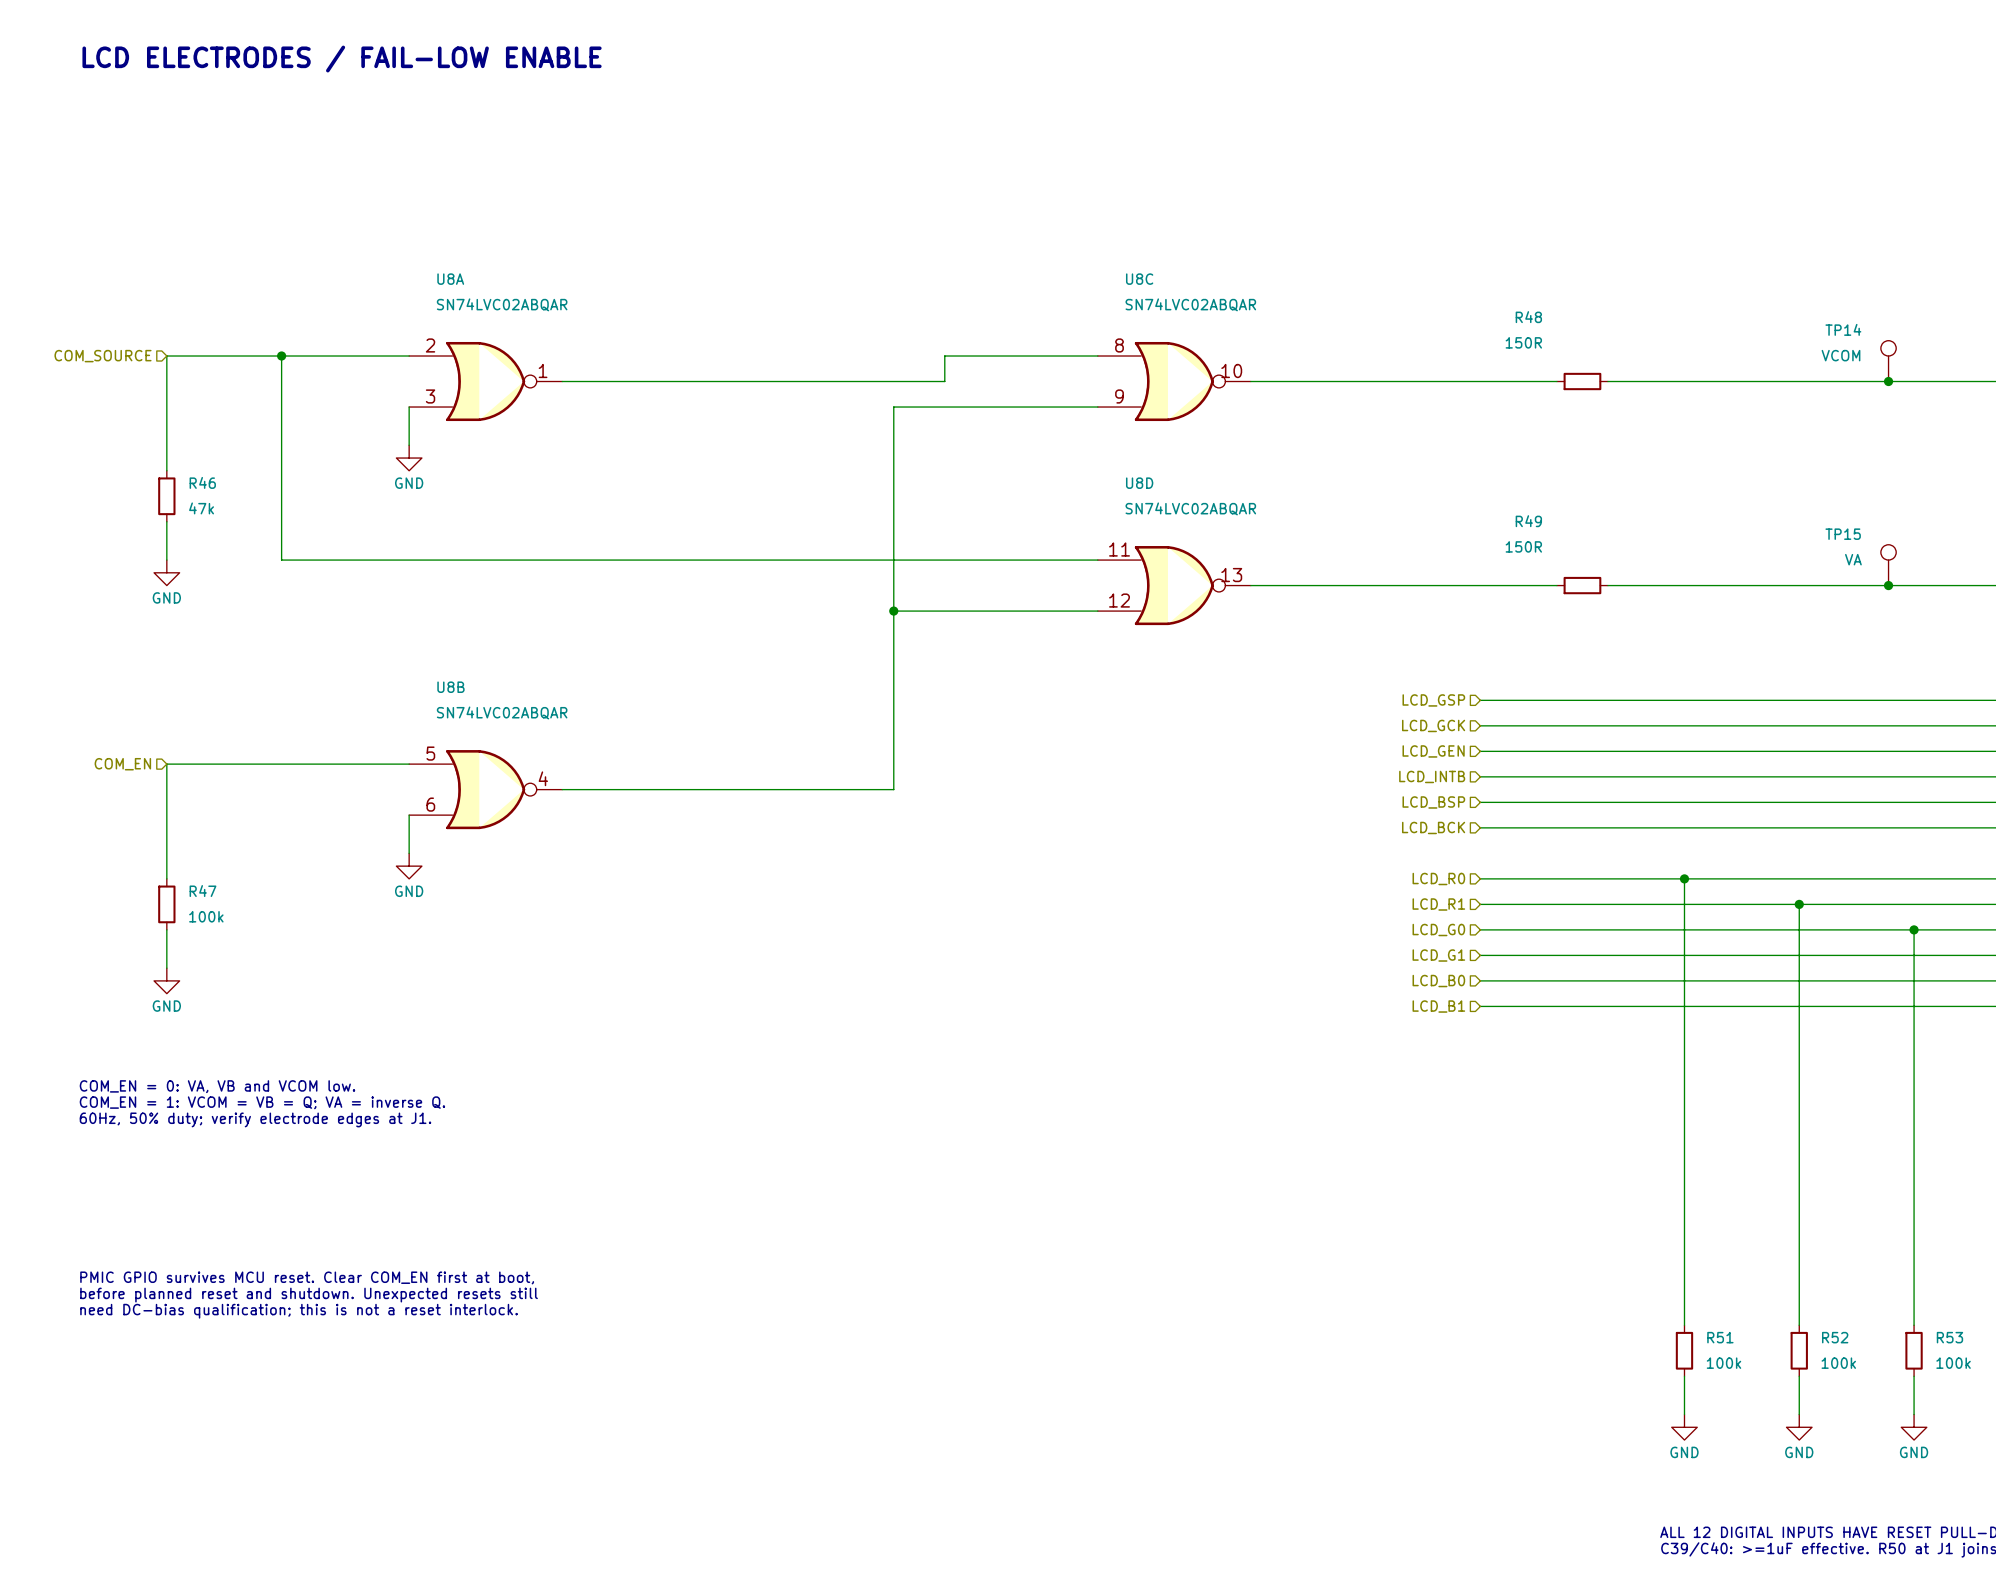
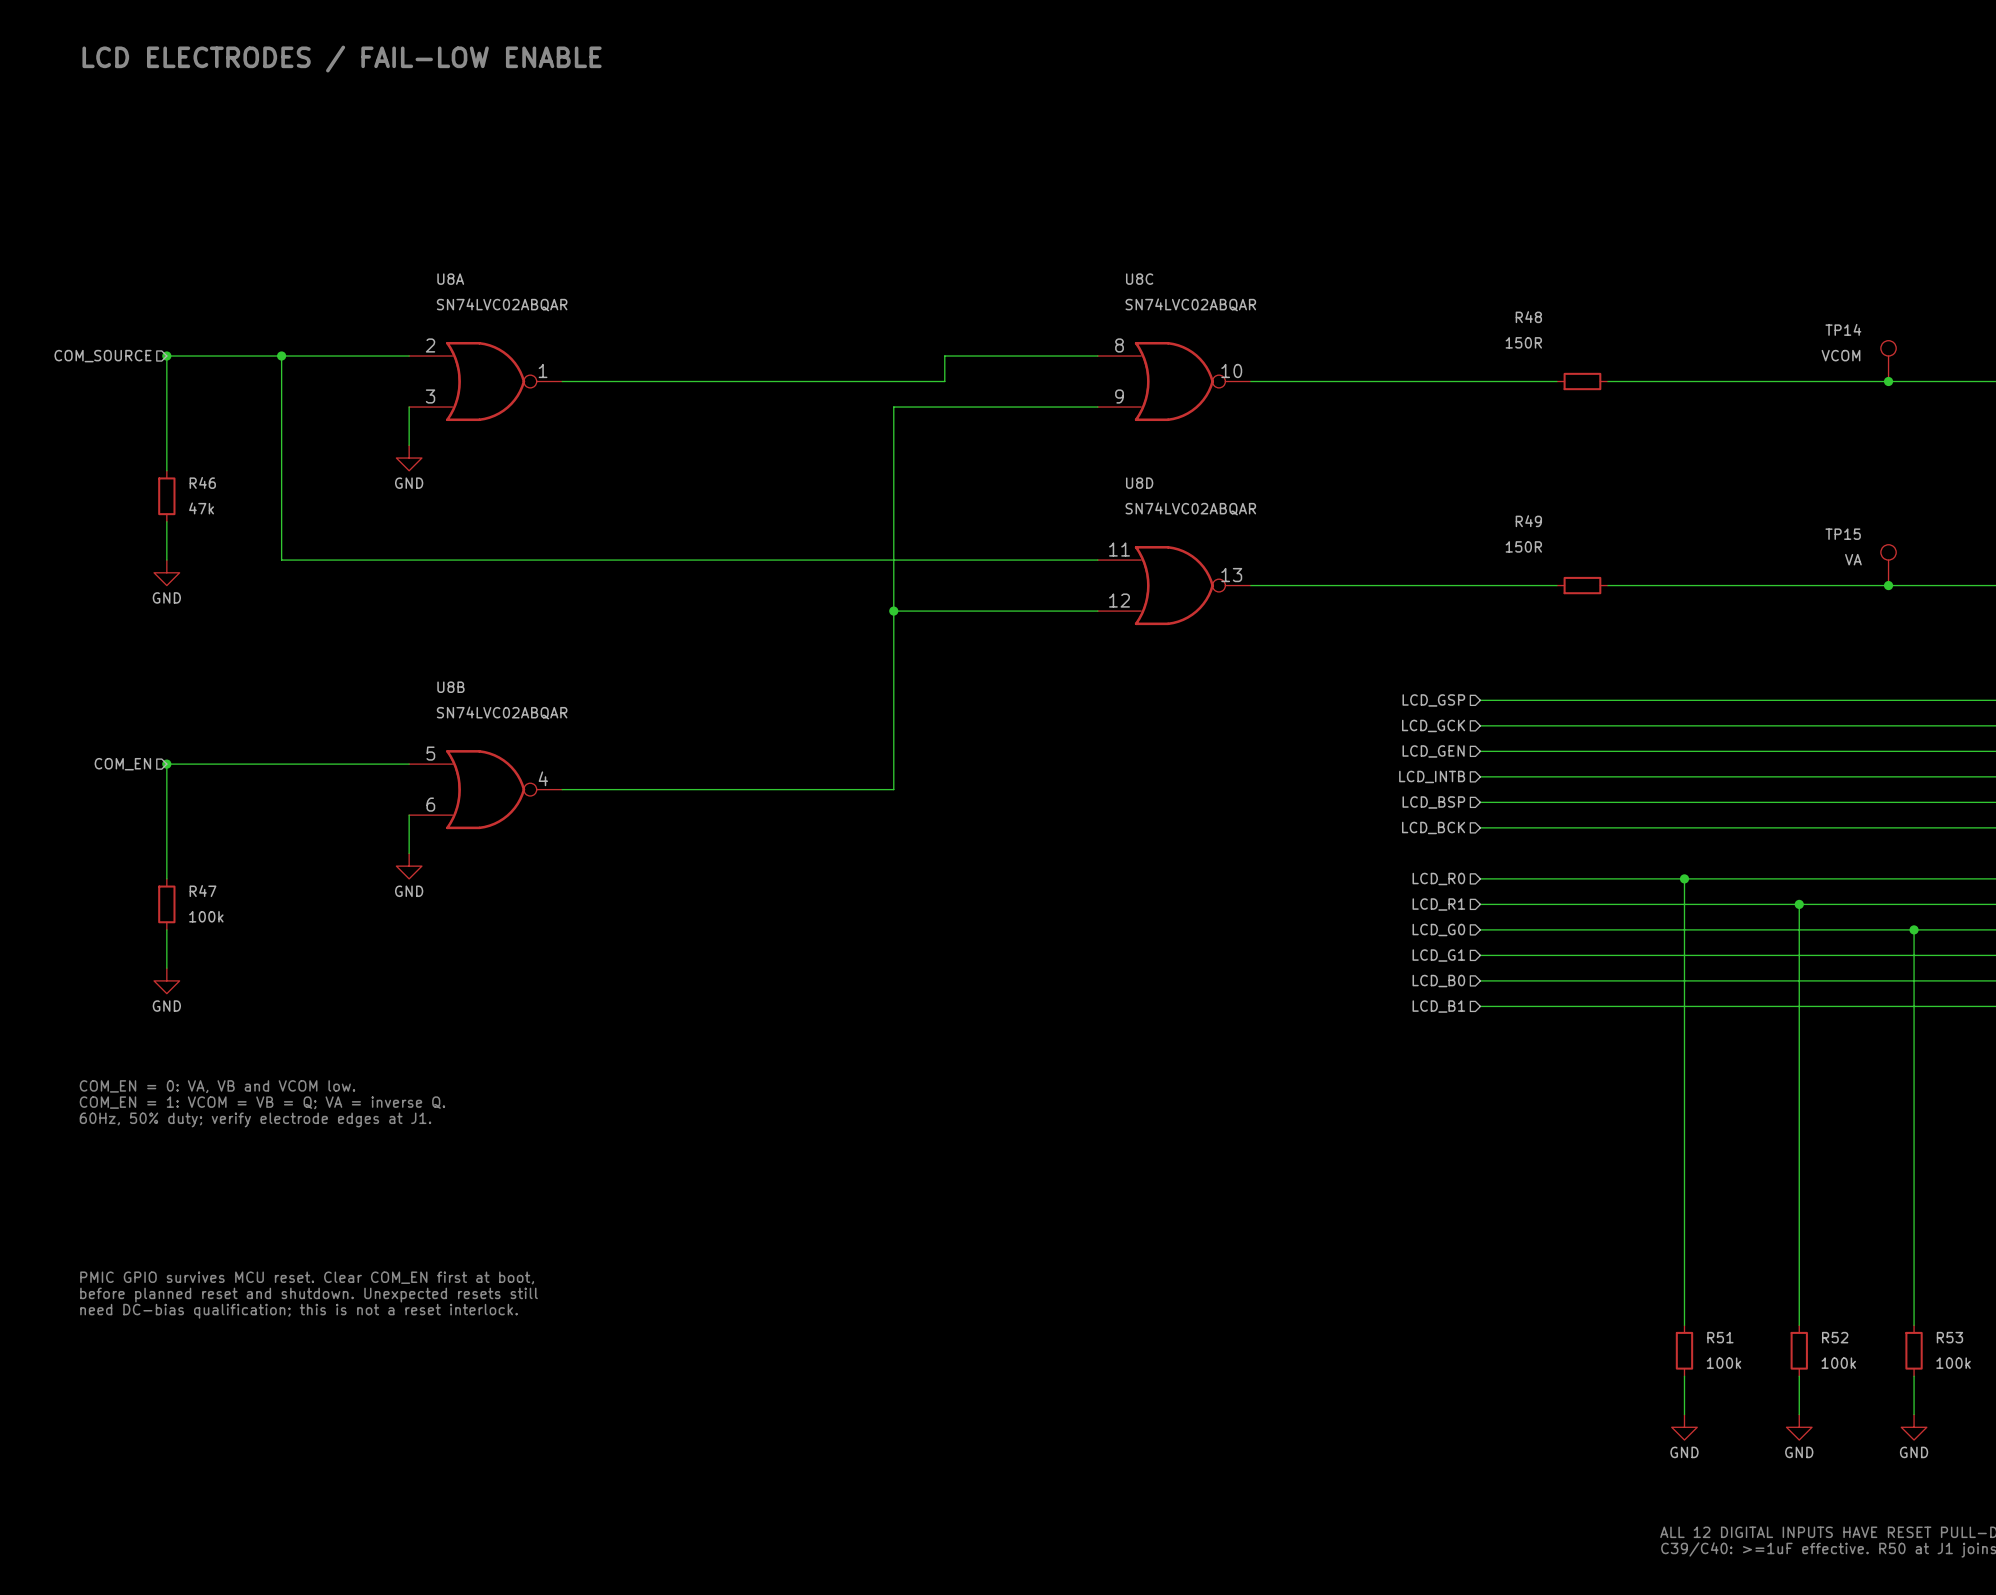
junction: none -> (166, 356)
junction: none -> (166, 764)

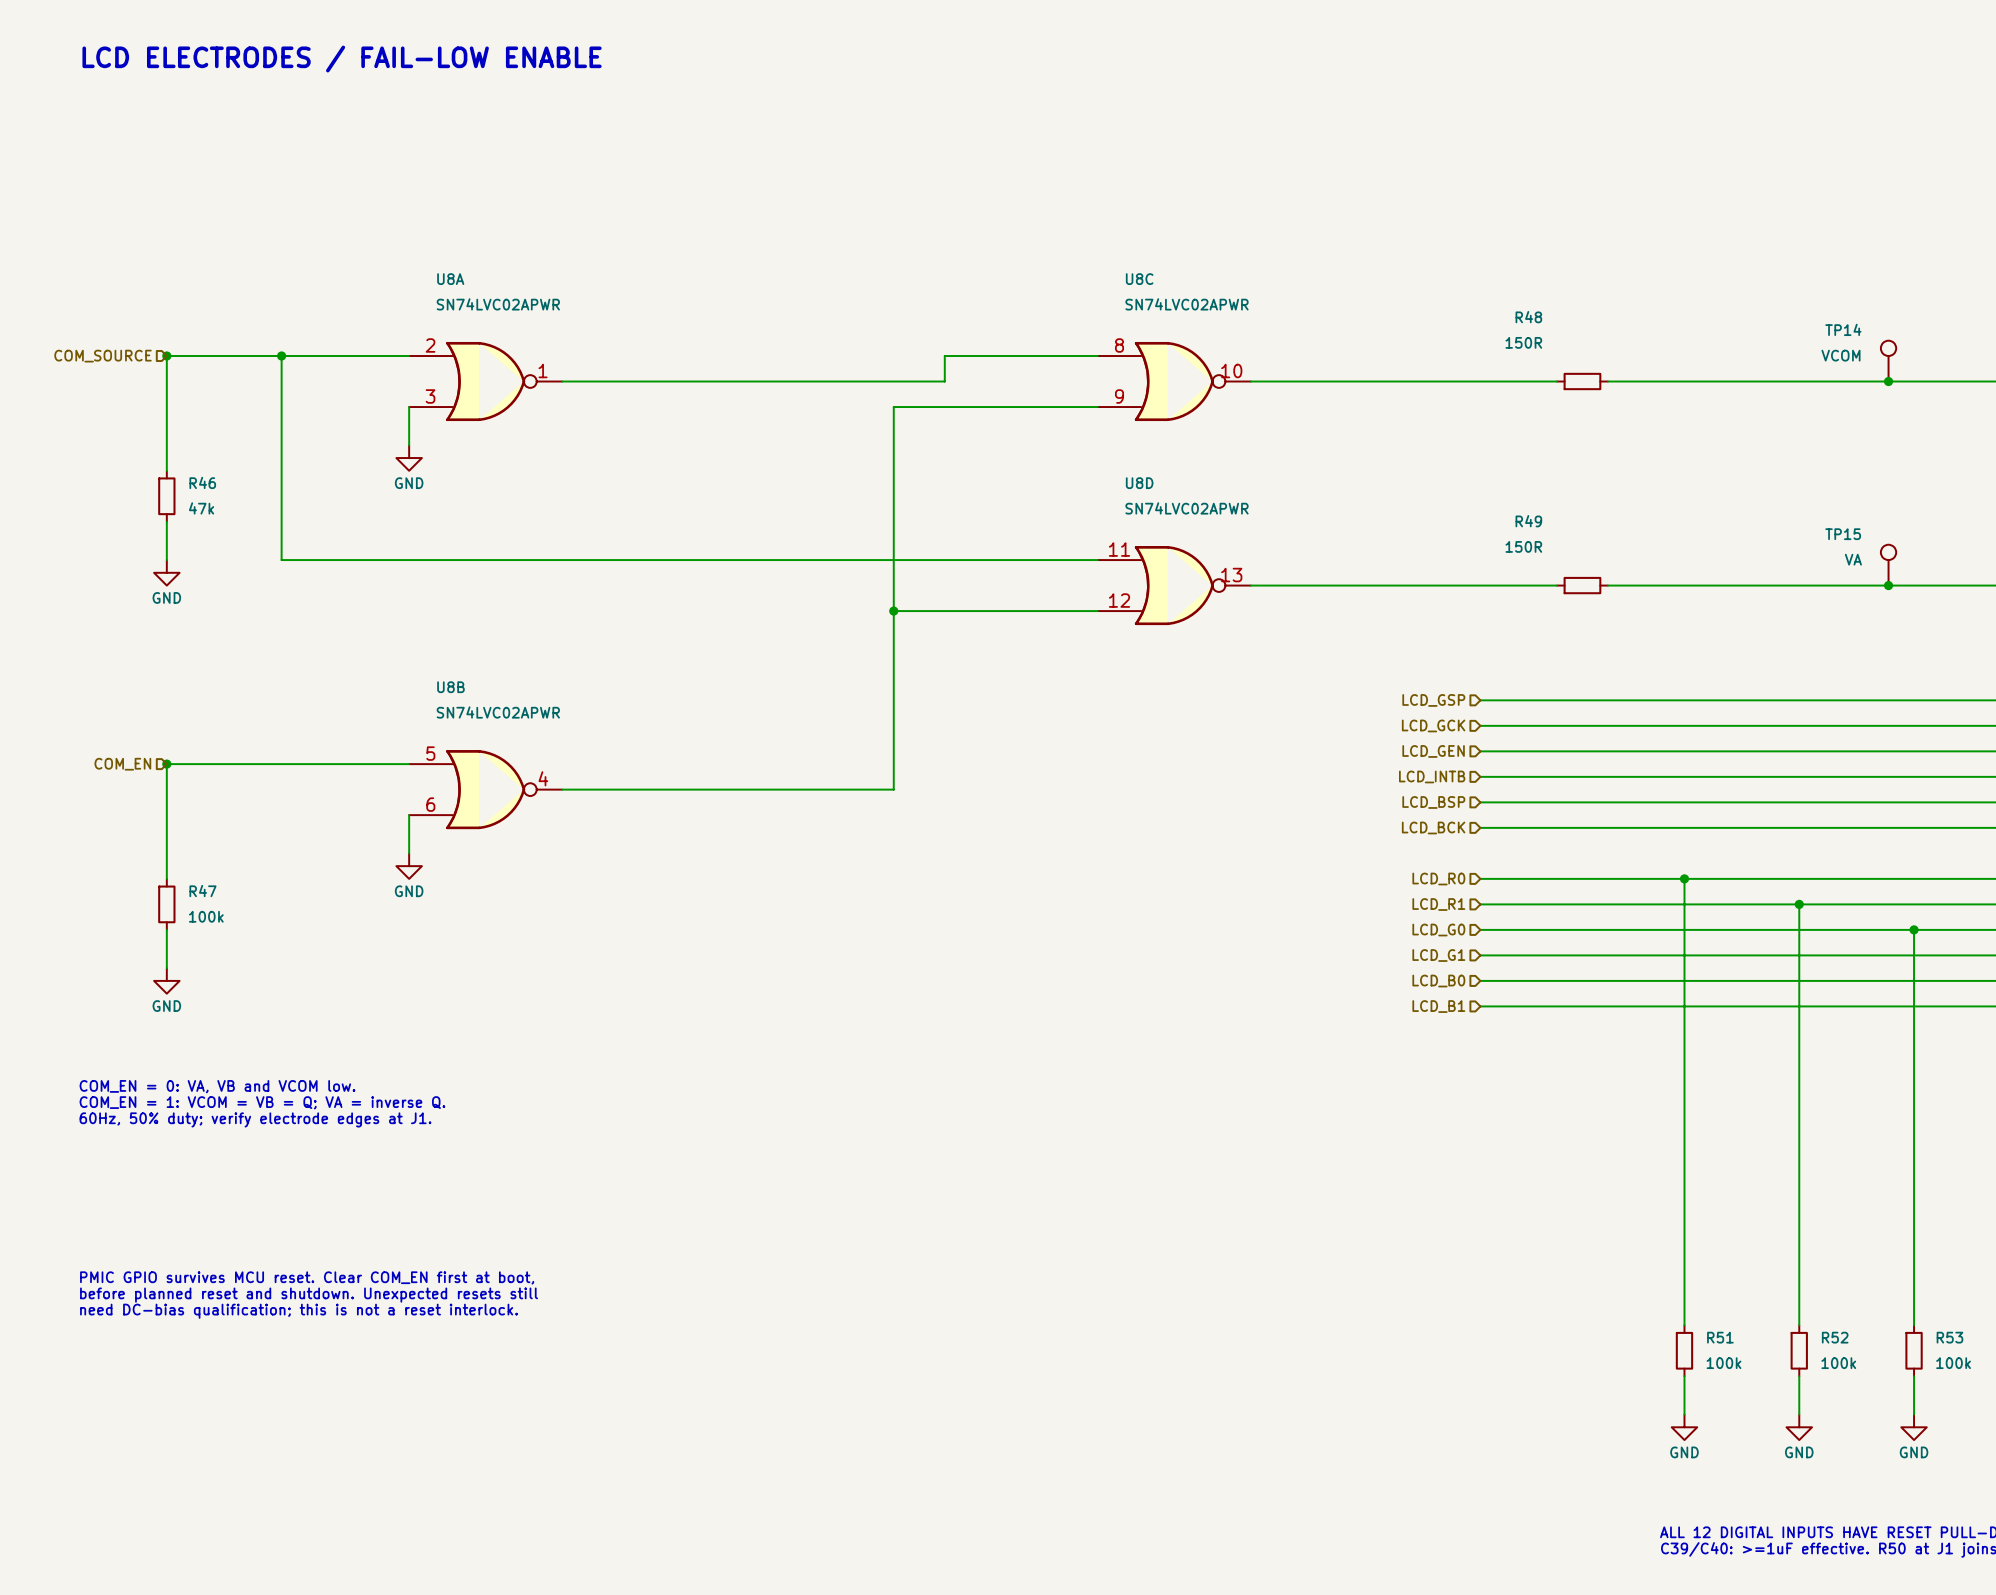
U8A value: SN74LVC02ABQAR (502, 304) -> SN74LVC02APWR (498, 304)
U8C value: SN74LVC02ABQAR (1190, 304) -> SN74LVC02APWR (1186, 304)
U8D value: SN74LVC02ABQAR (1190, 508) -> SN74LVC02APWR (1186, 508)
U8B value: SN74LVC02ABQAR (502, 712) -> SN74LVC02APWR (498, 712)

